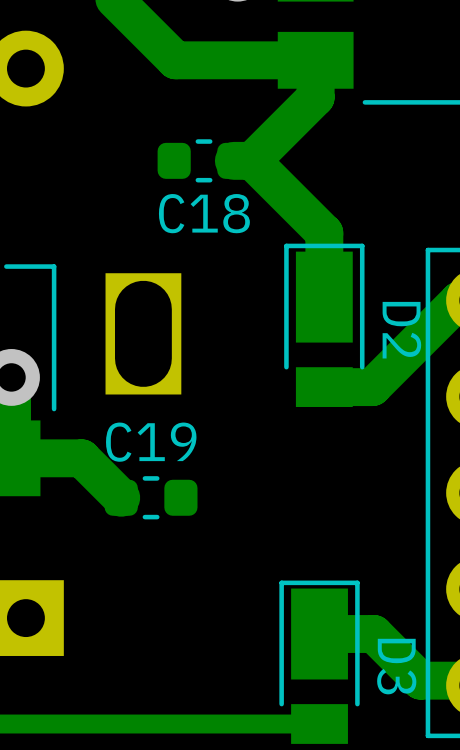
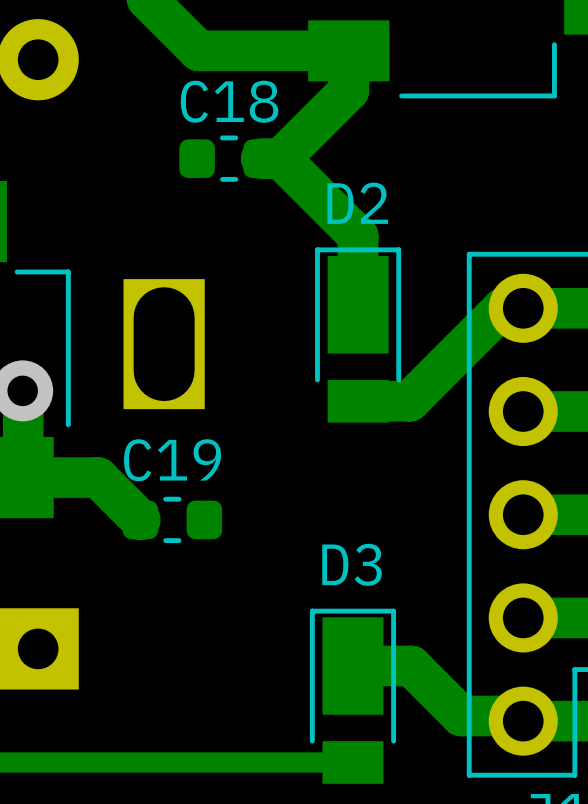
C18 name position: C18 (204, 213) -> C18 (229, 101)
D2 name rotation: 0° (401, 330) -> 90° counterclockwise (357, 203)
D2 name position: D2 (401, 330) -> D2 (357, 203)
D3 name rotation: 0° (396, 666) -> 90° counterclockwise (352, 564)
D3 name position: D3 (396, 666) -> D3 (352, 564)

